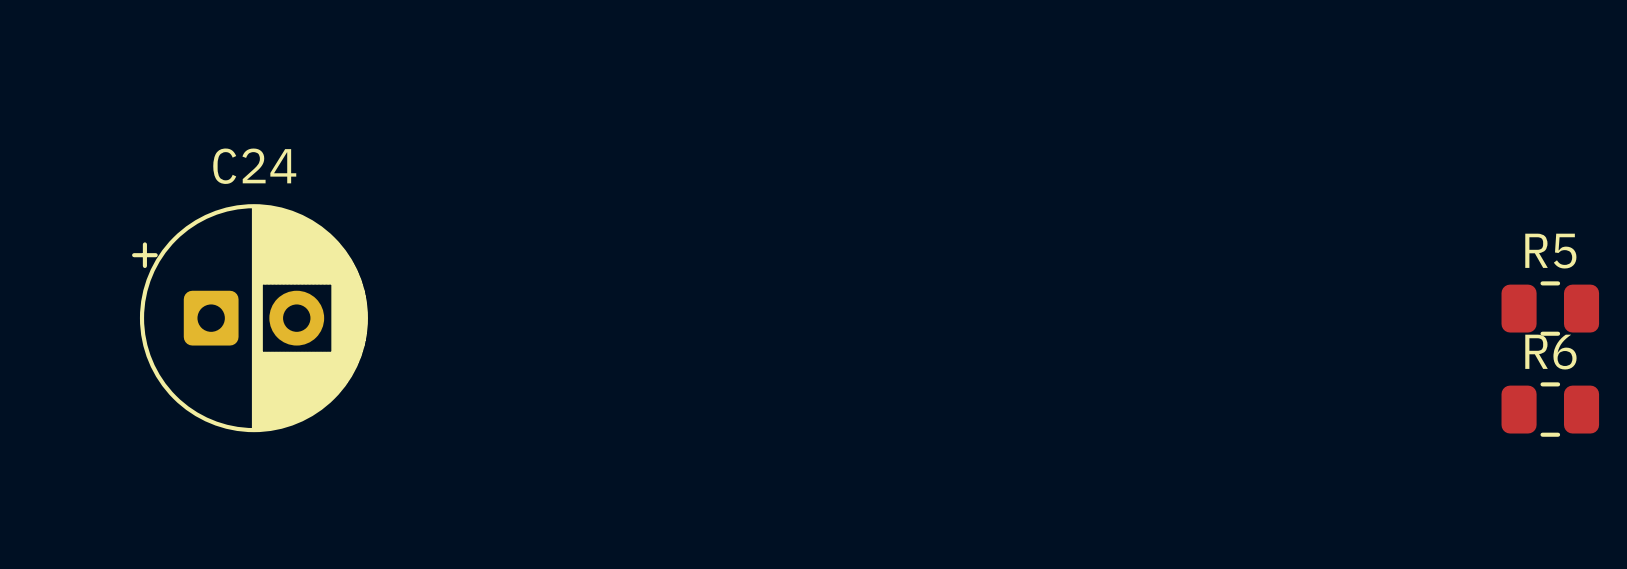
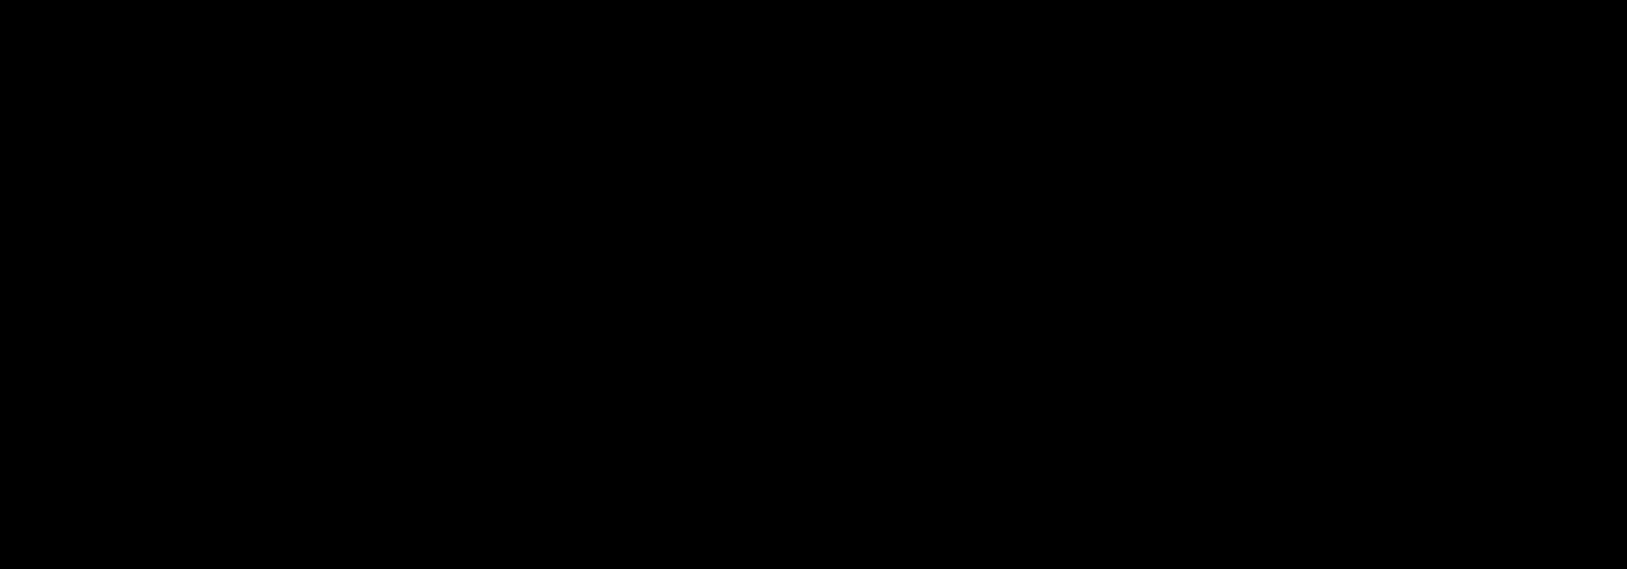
R5: (1550, 308) -> none
C24: (250, 318) -> none
R6: (1550, 409) -> none

